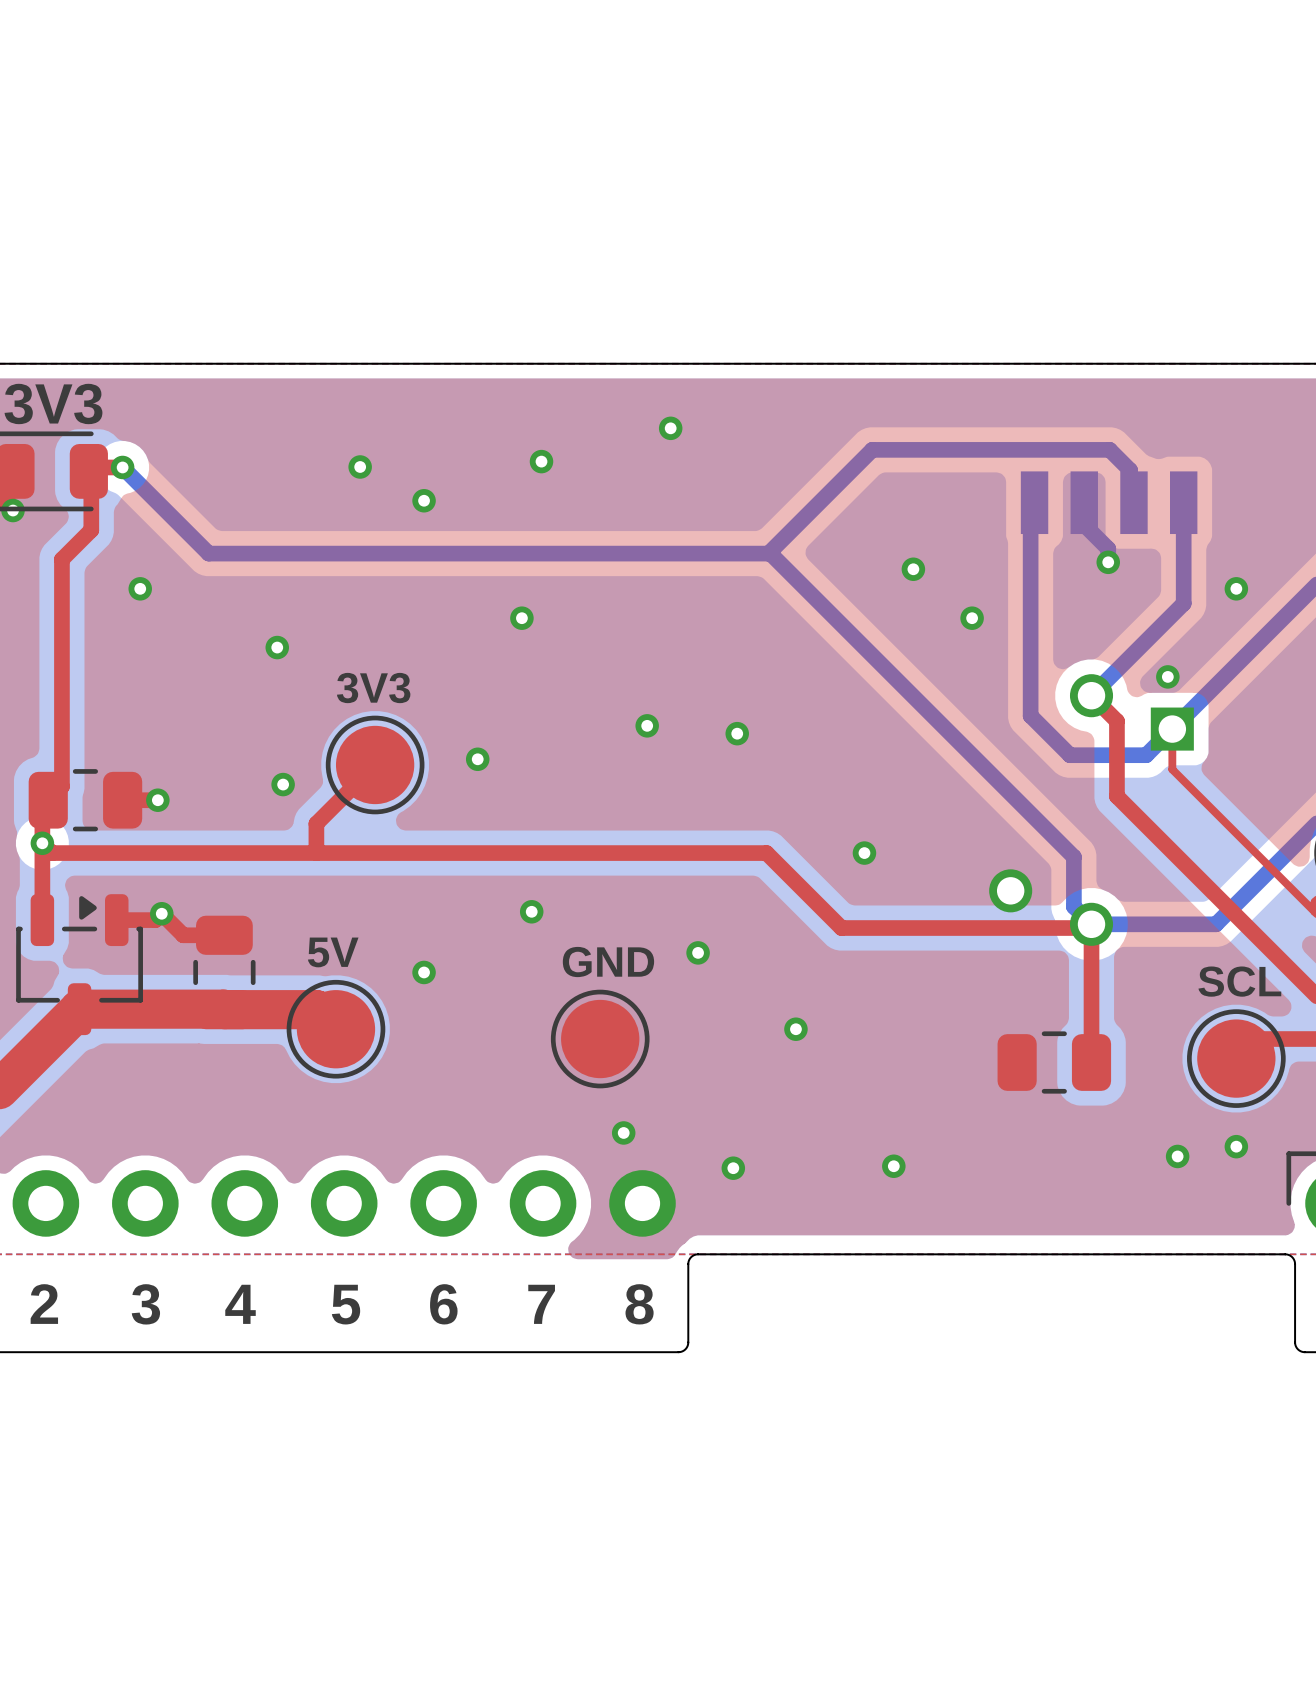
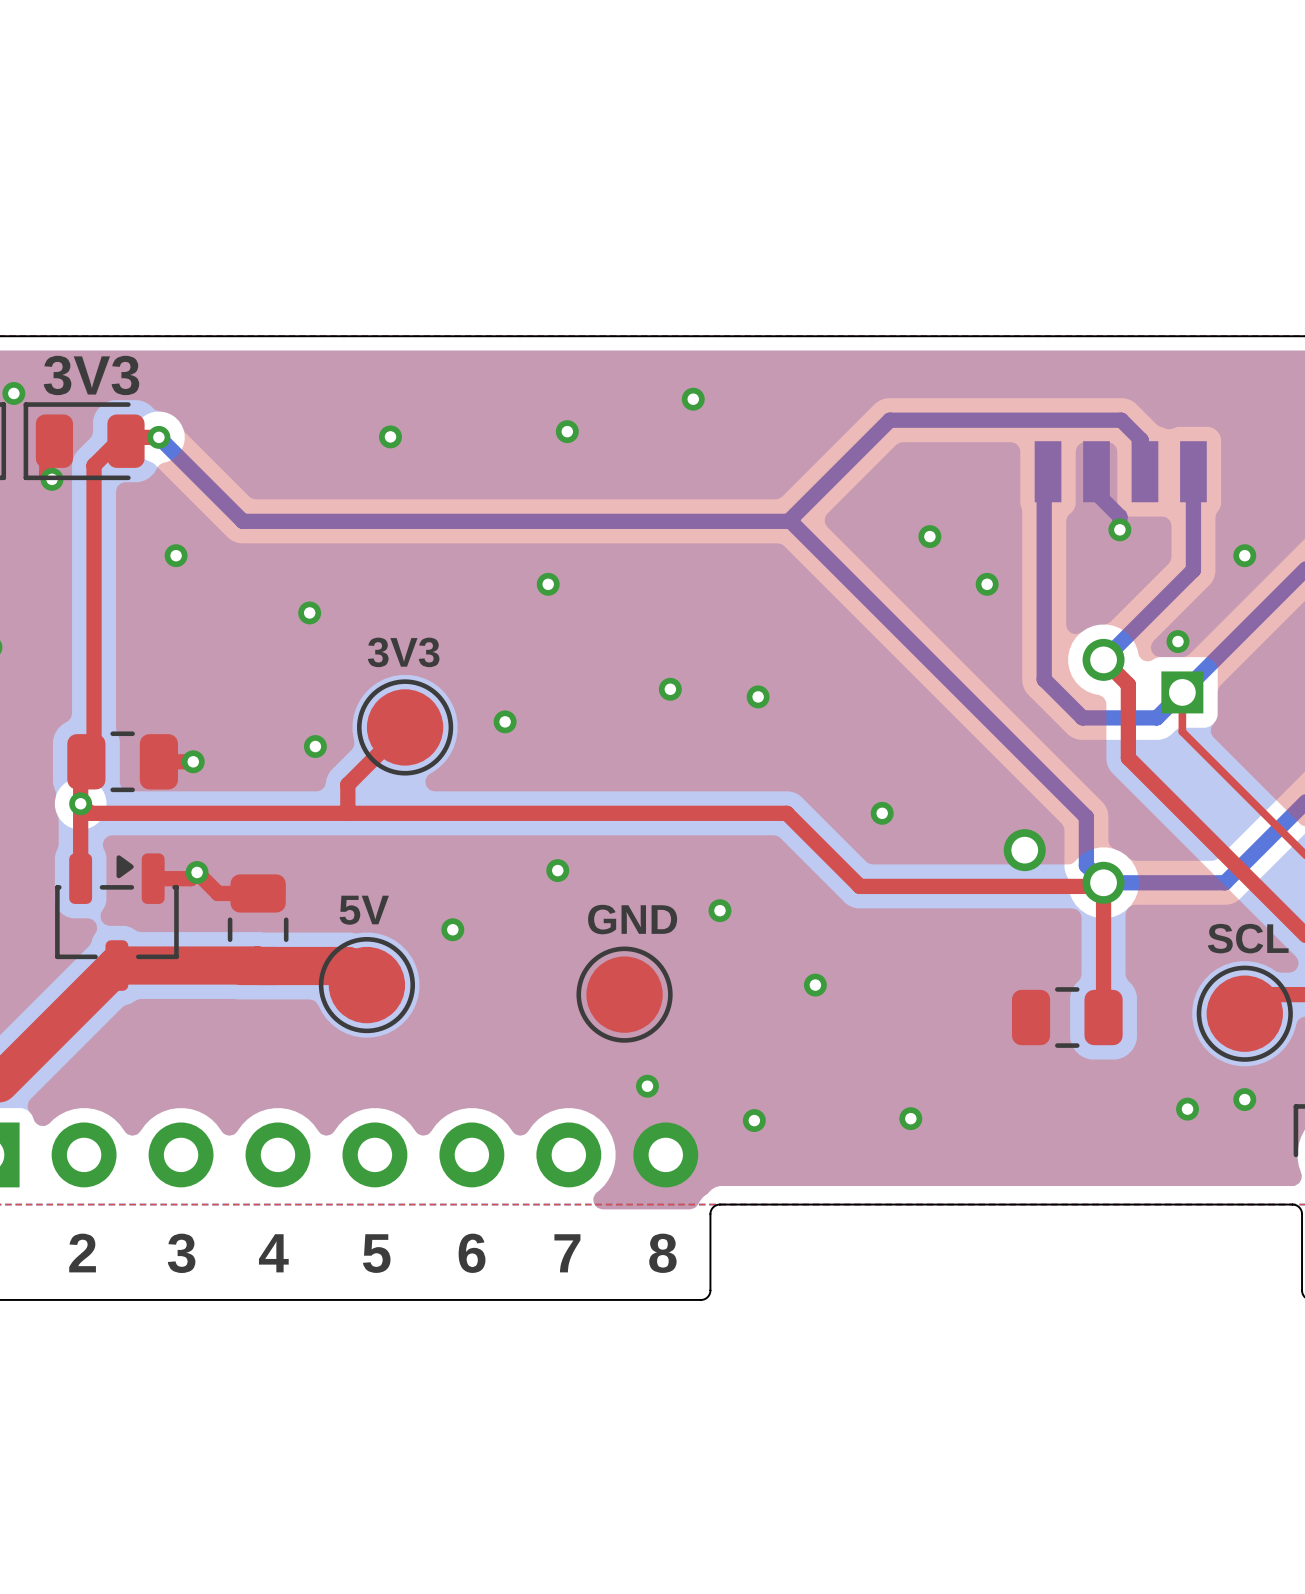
top track: (88, 471) (91, 473) (91, 530) (61, 559) (61, 786) (56, 792) -> (125, 441) (118, 441) (94, 465) (94, 754)
via: (424, 500) -> none

